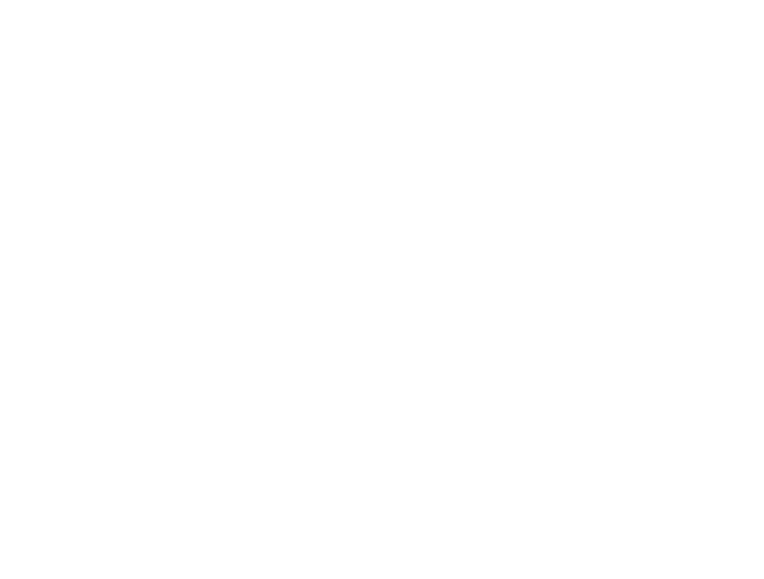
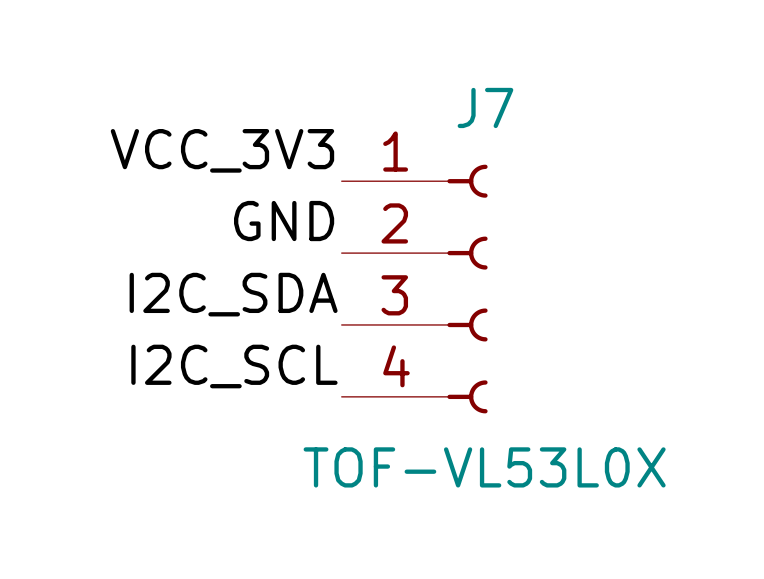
label: none -> VCC_3V3 (222, 150)
label: none -> GND (284, 221)
J7: none -> TOF-VL53L0X (414, 289)
label: none -> I2C_SDA (233, 294)
label: none -> I2C_SCL (234, 366)

